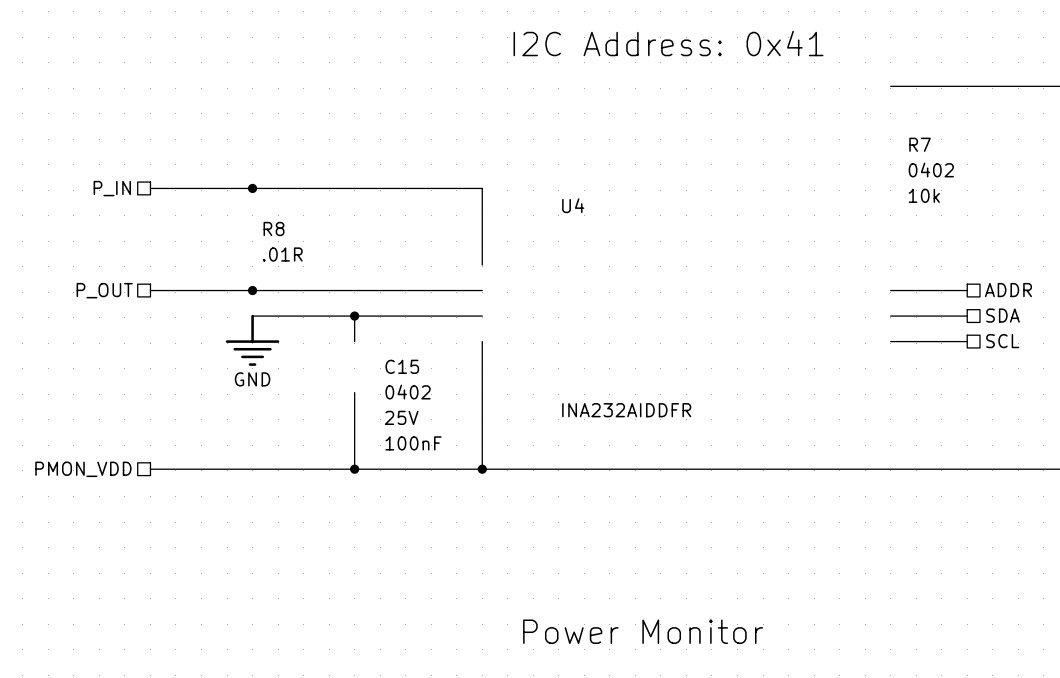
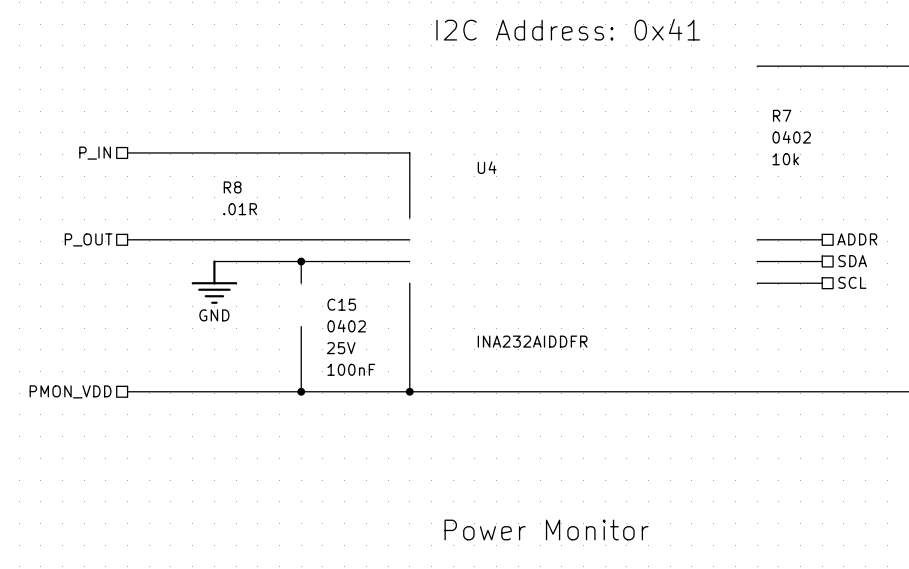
junction: (252, 188) -> none
junction: (252, 290) -> none

